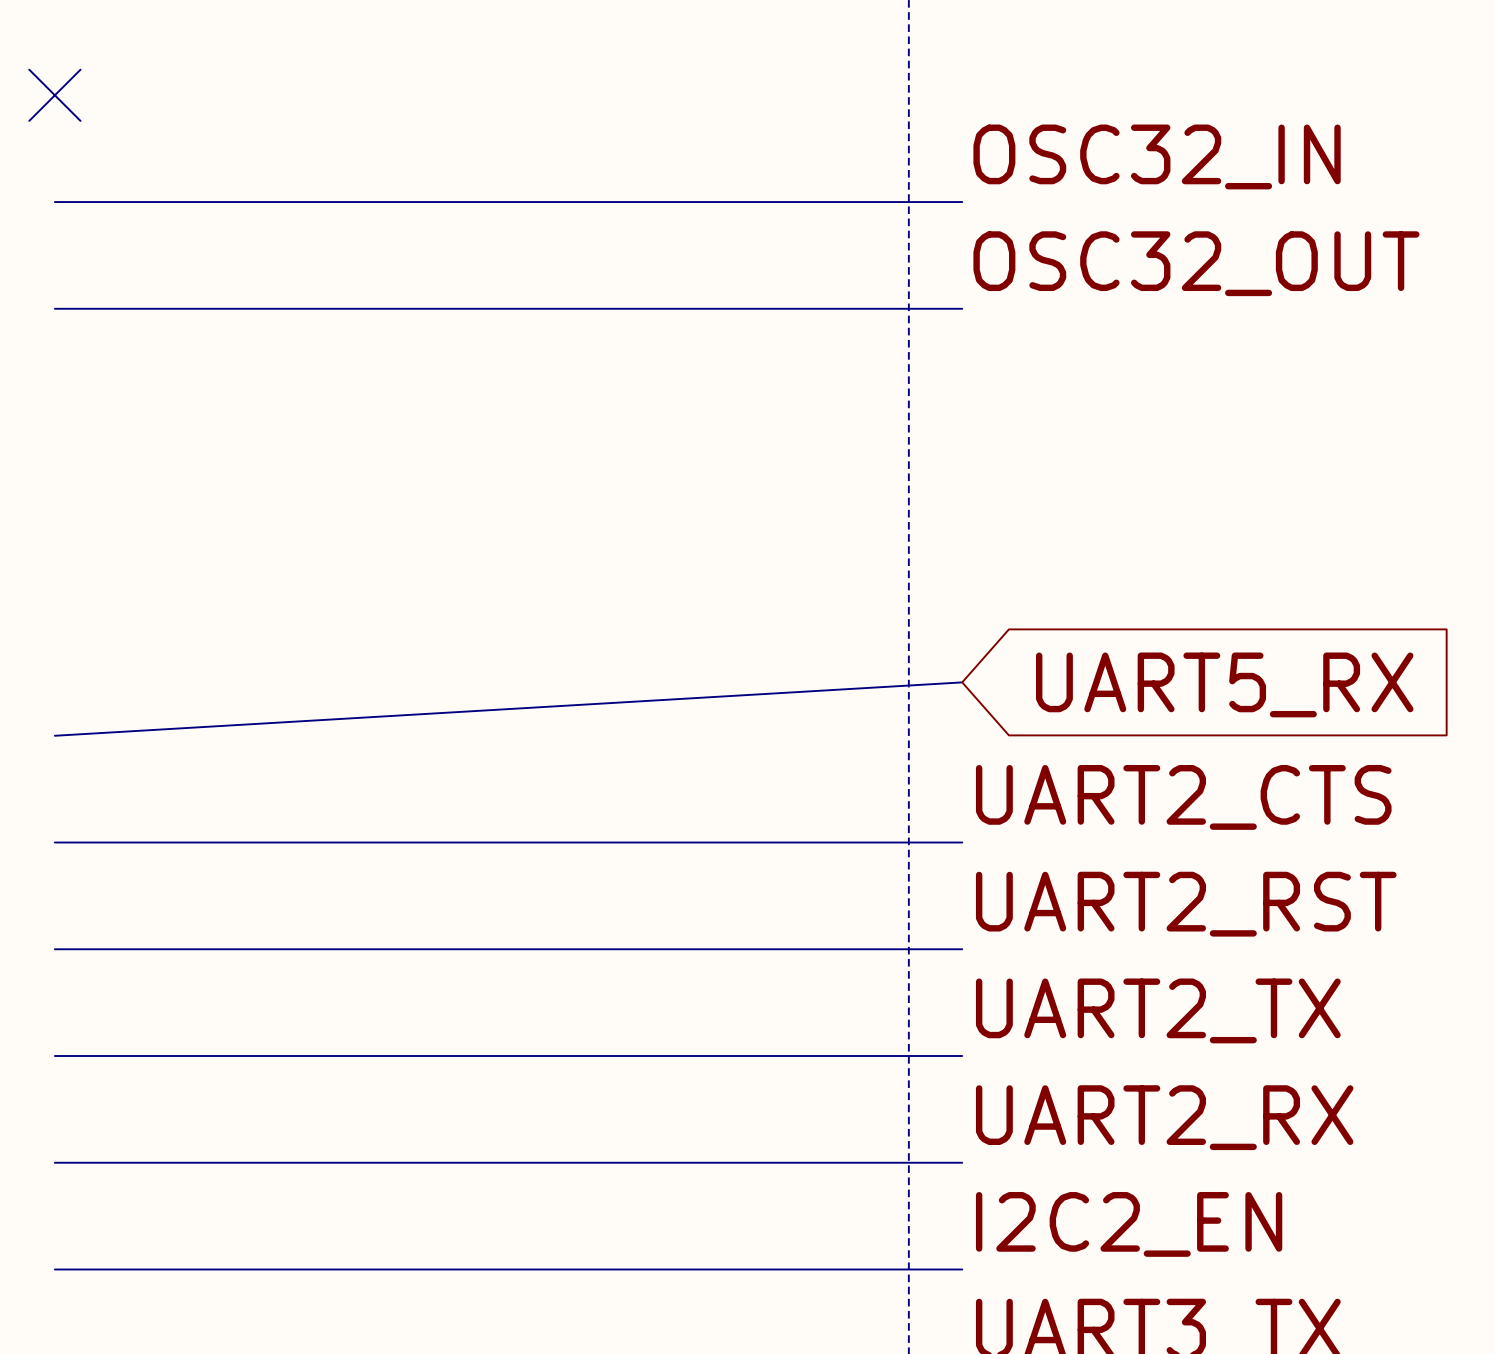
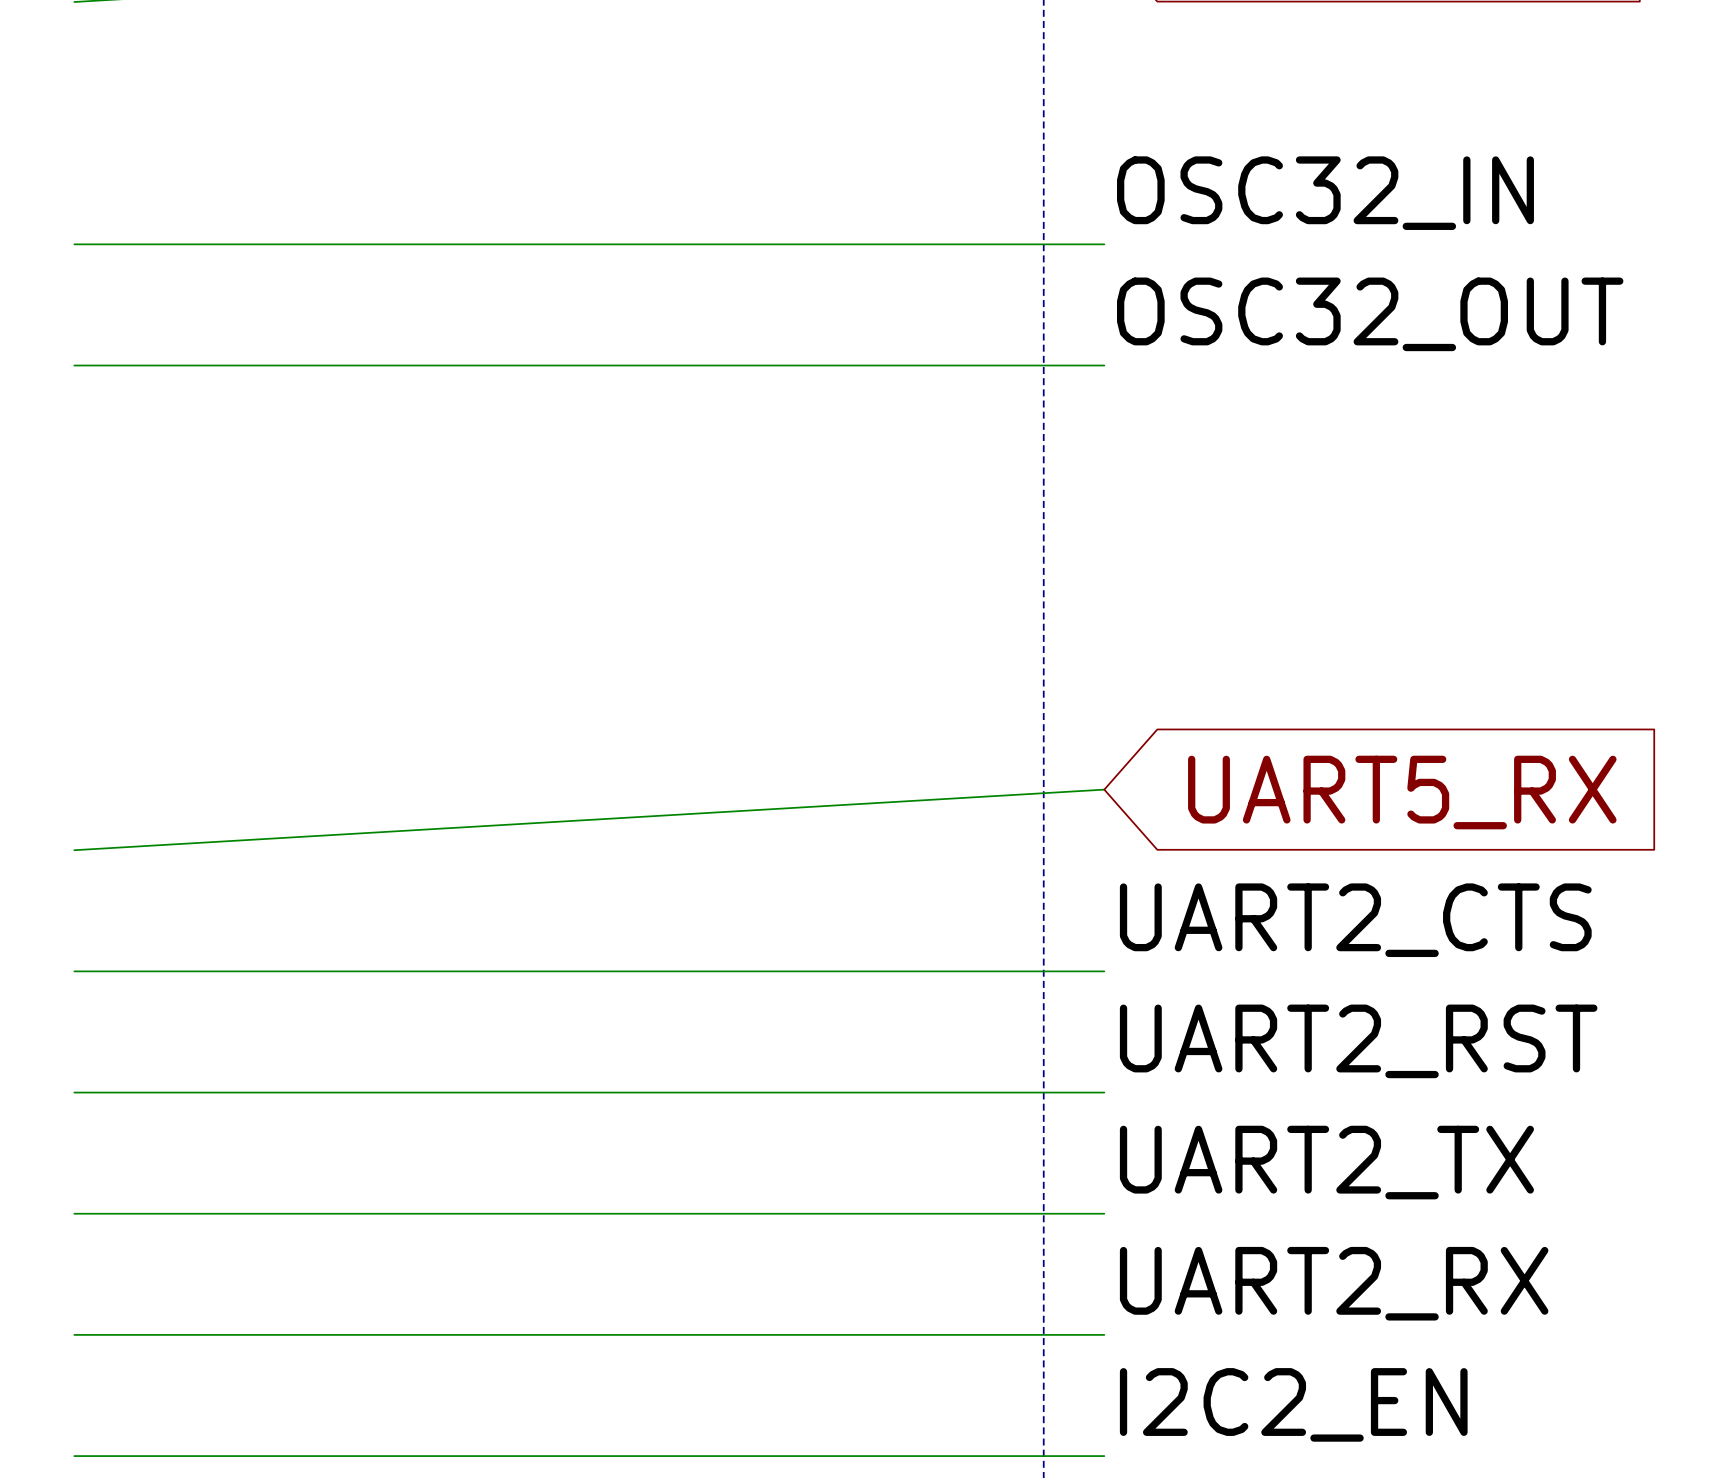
no-connect mark: (54, 95) -> none

